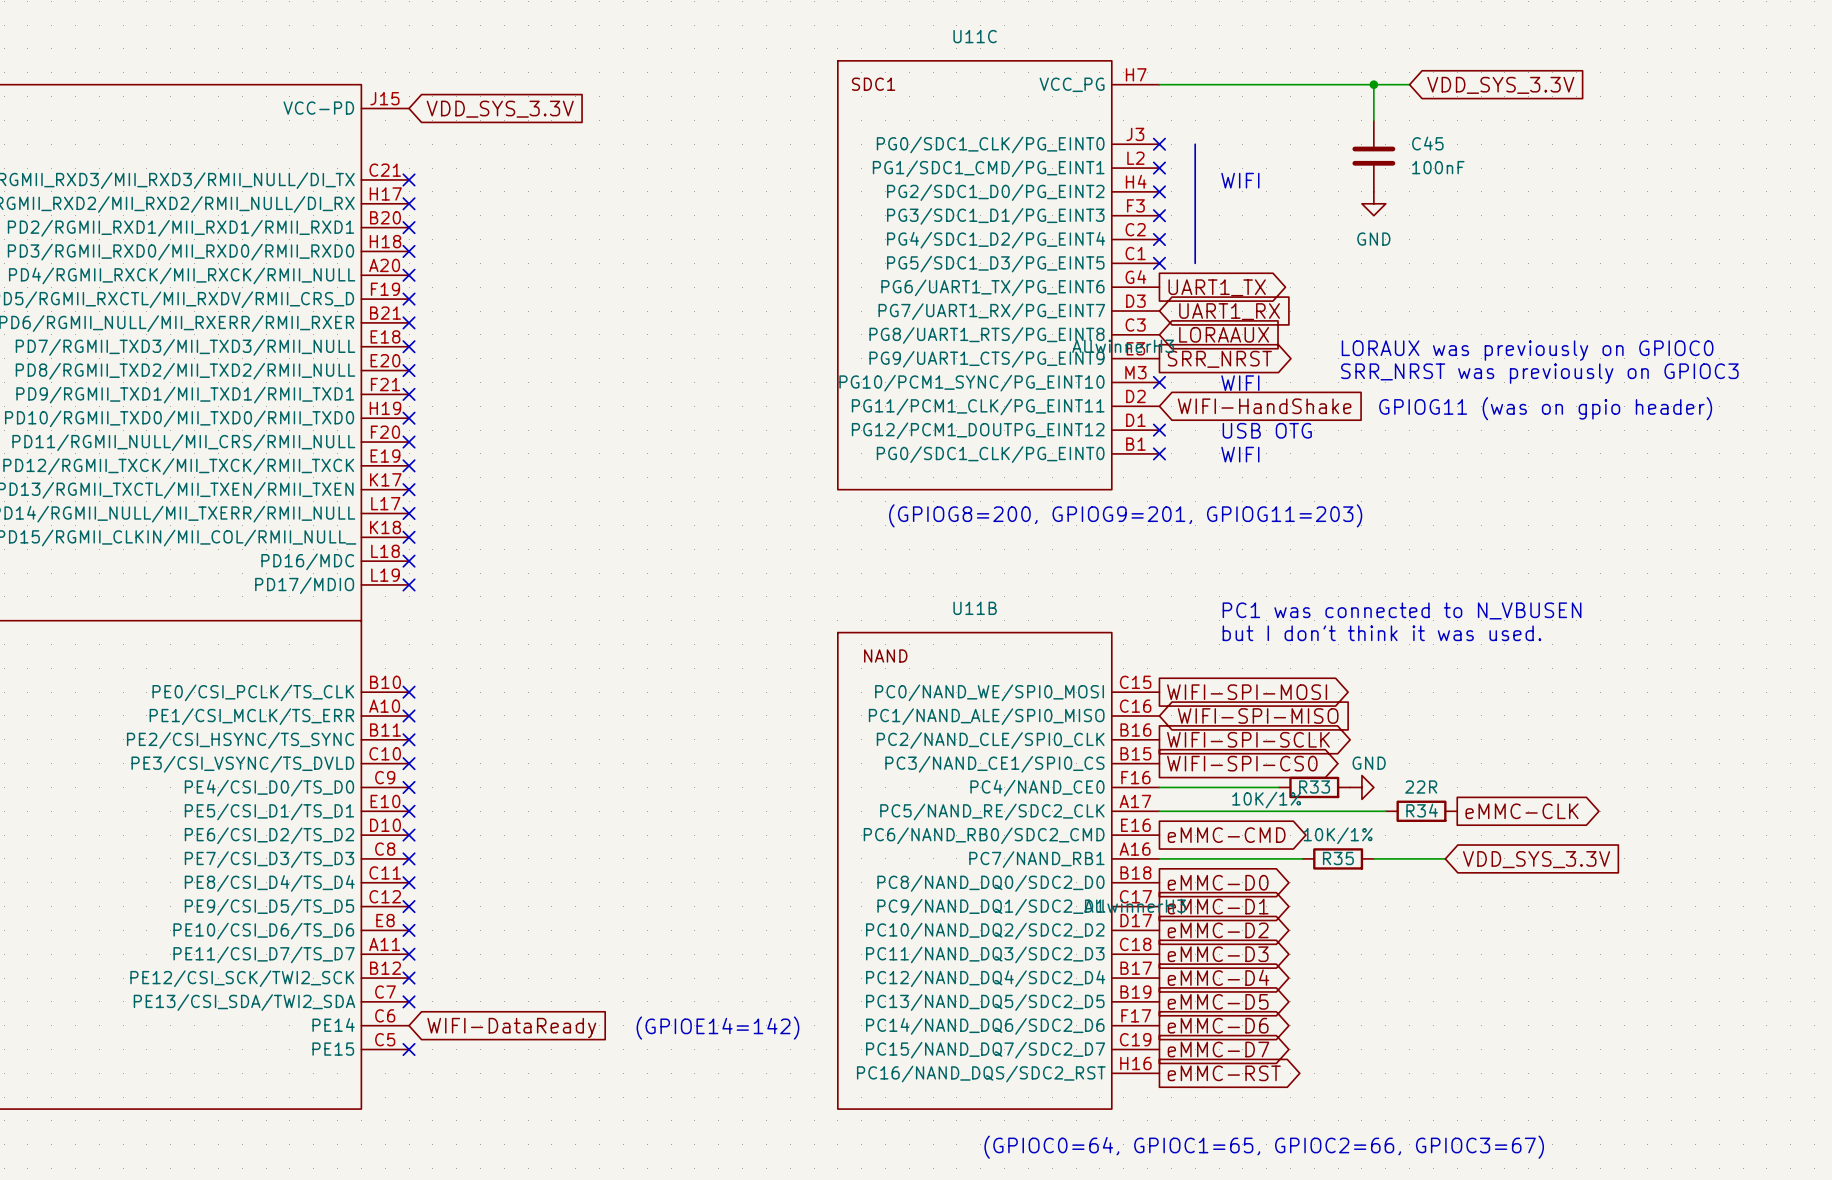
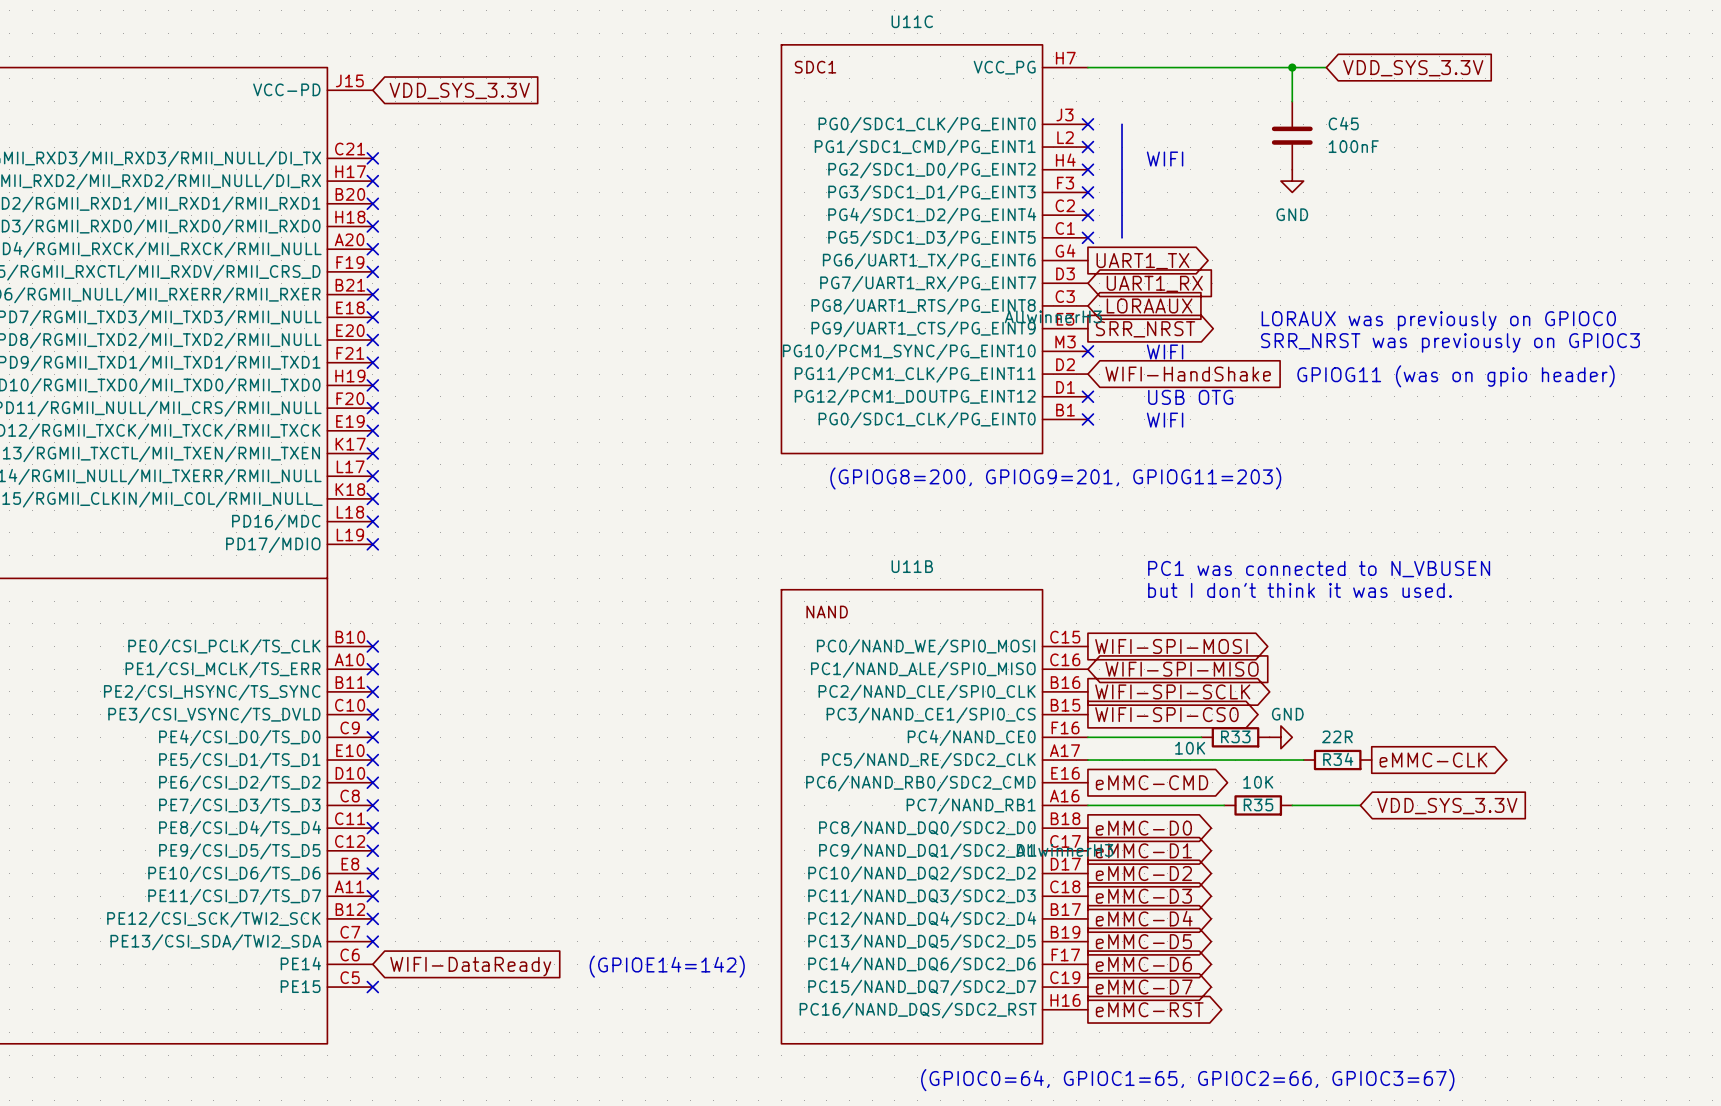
R33 value: 10K/1% (1266, 800) -> 10K (1190, 748)
R35 value: 10K/1% (1338, 835) -> 10K (1258, 782)

